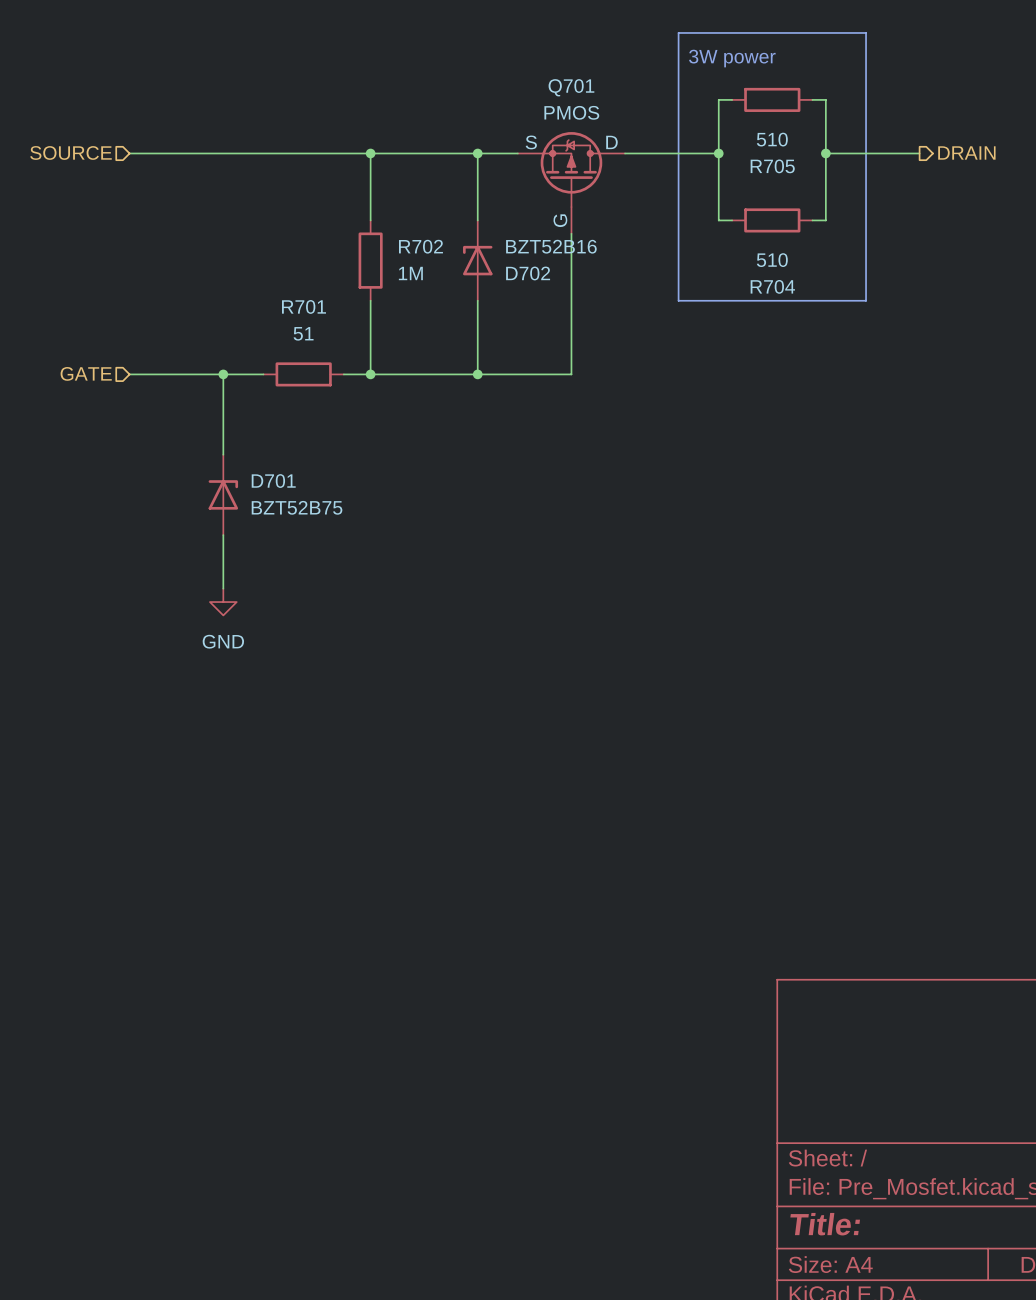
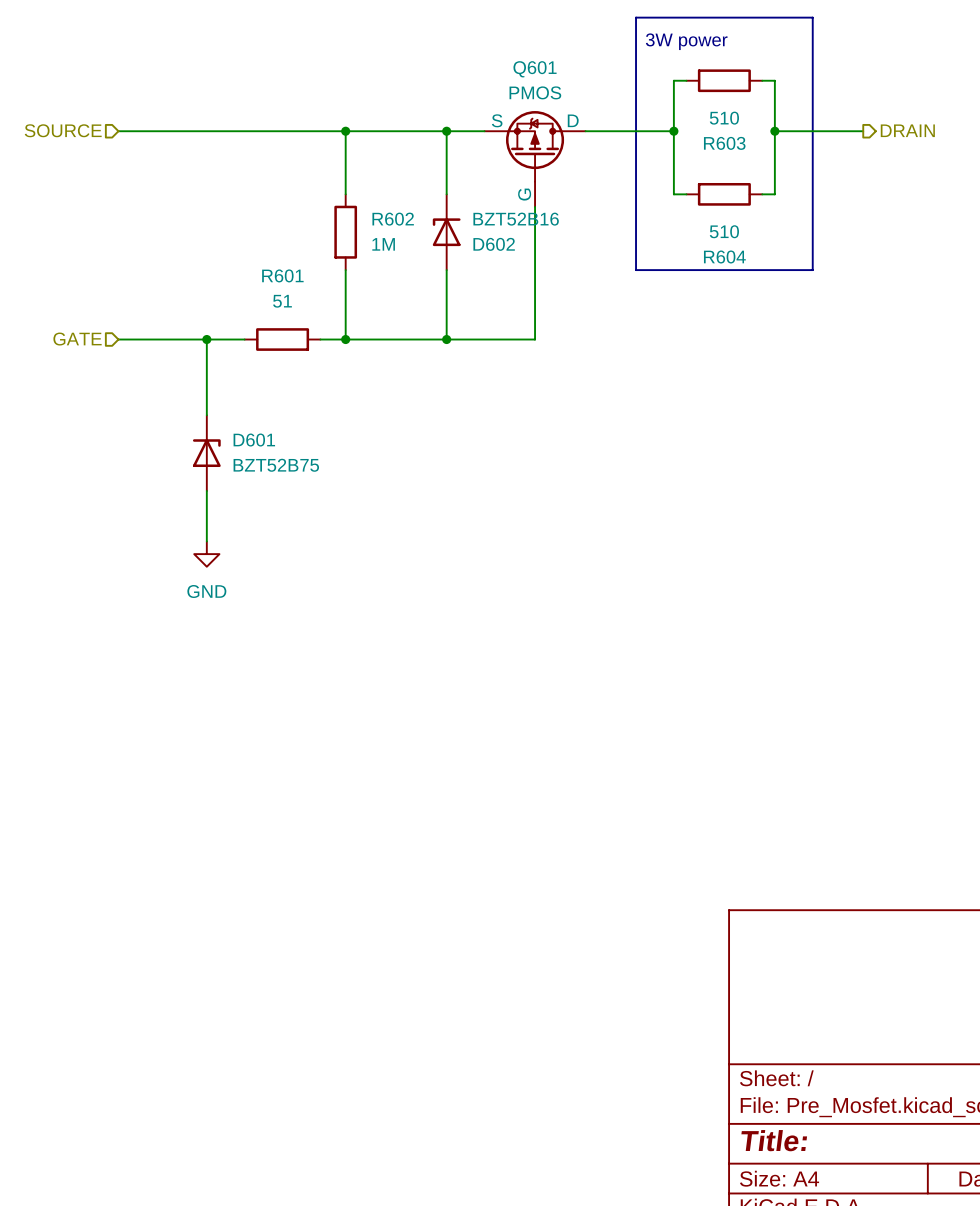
Q701 name: Q701 (571, 87) -> Q601 (535, 69)
R705 name: R705 (772, 166) -> R603 (724, 143)
R702 name: R702 (420, 246) -> R602 (393, 219)
D702 name: D702 (528, 273) -> D602 (494, 244)
R704 name: R704 (772, 286) -> R604 (724, 256)
R701 name: R701 (303, 306) -> R601 (282, 275)
D701 name: D701 (273, 481) -> D601 (254, 440)

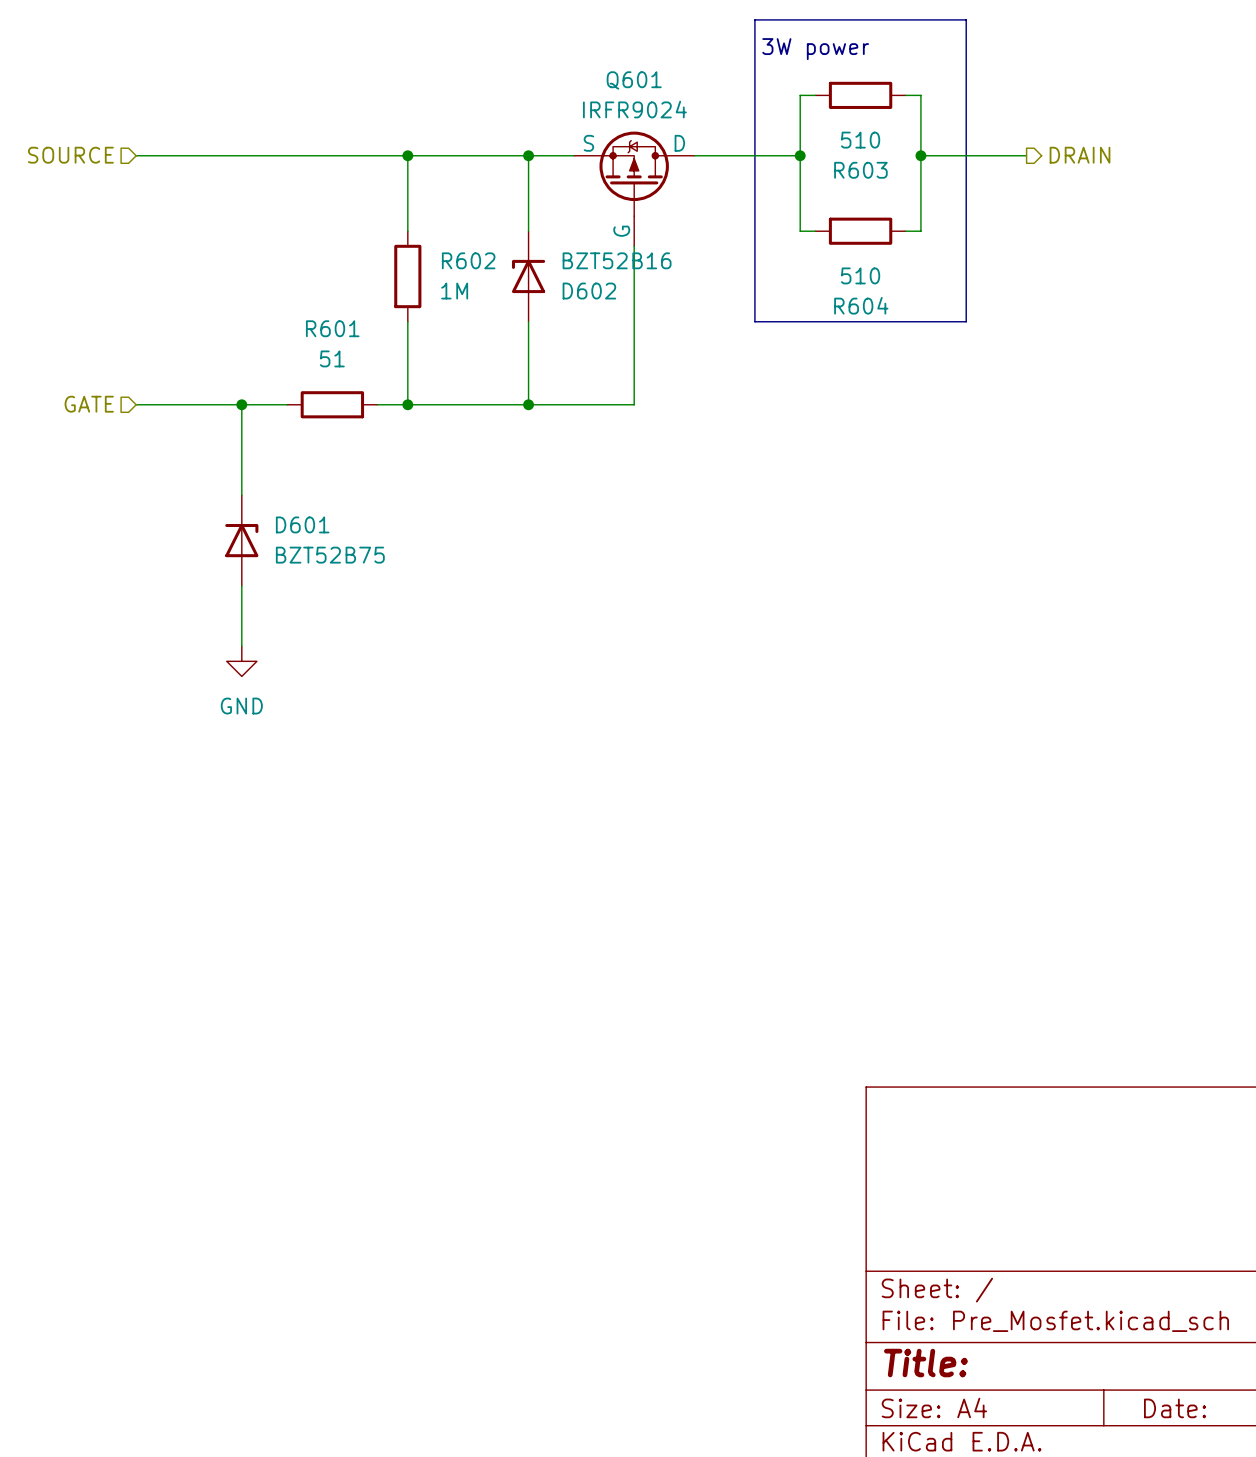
Q601 value: PMOS (535, 92) -> IRFR9024 (634, 109)

